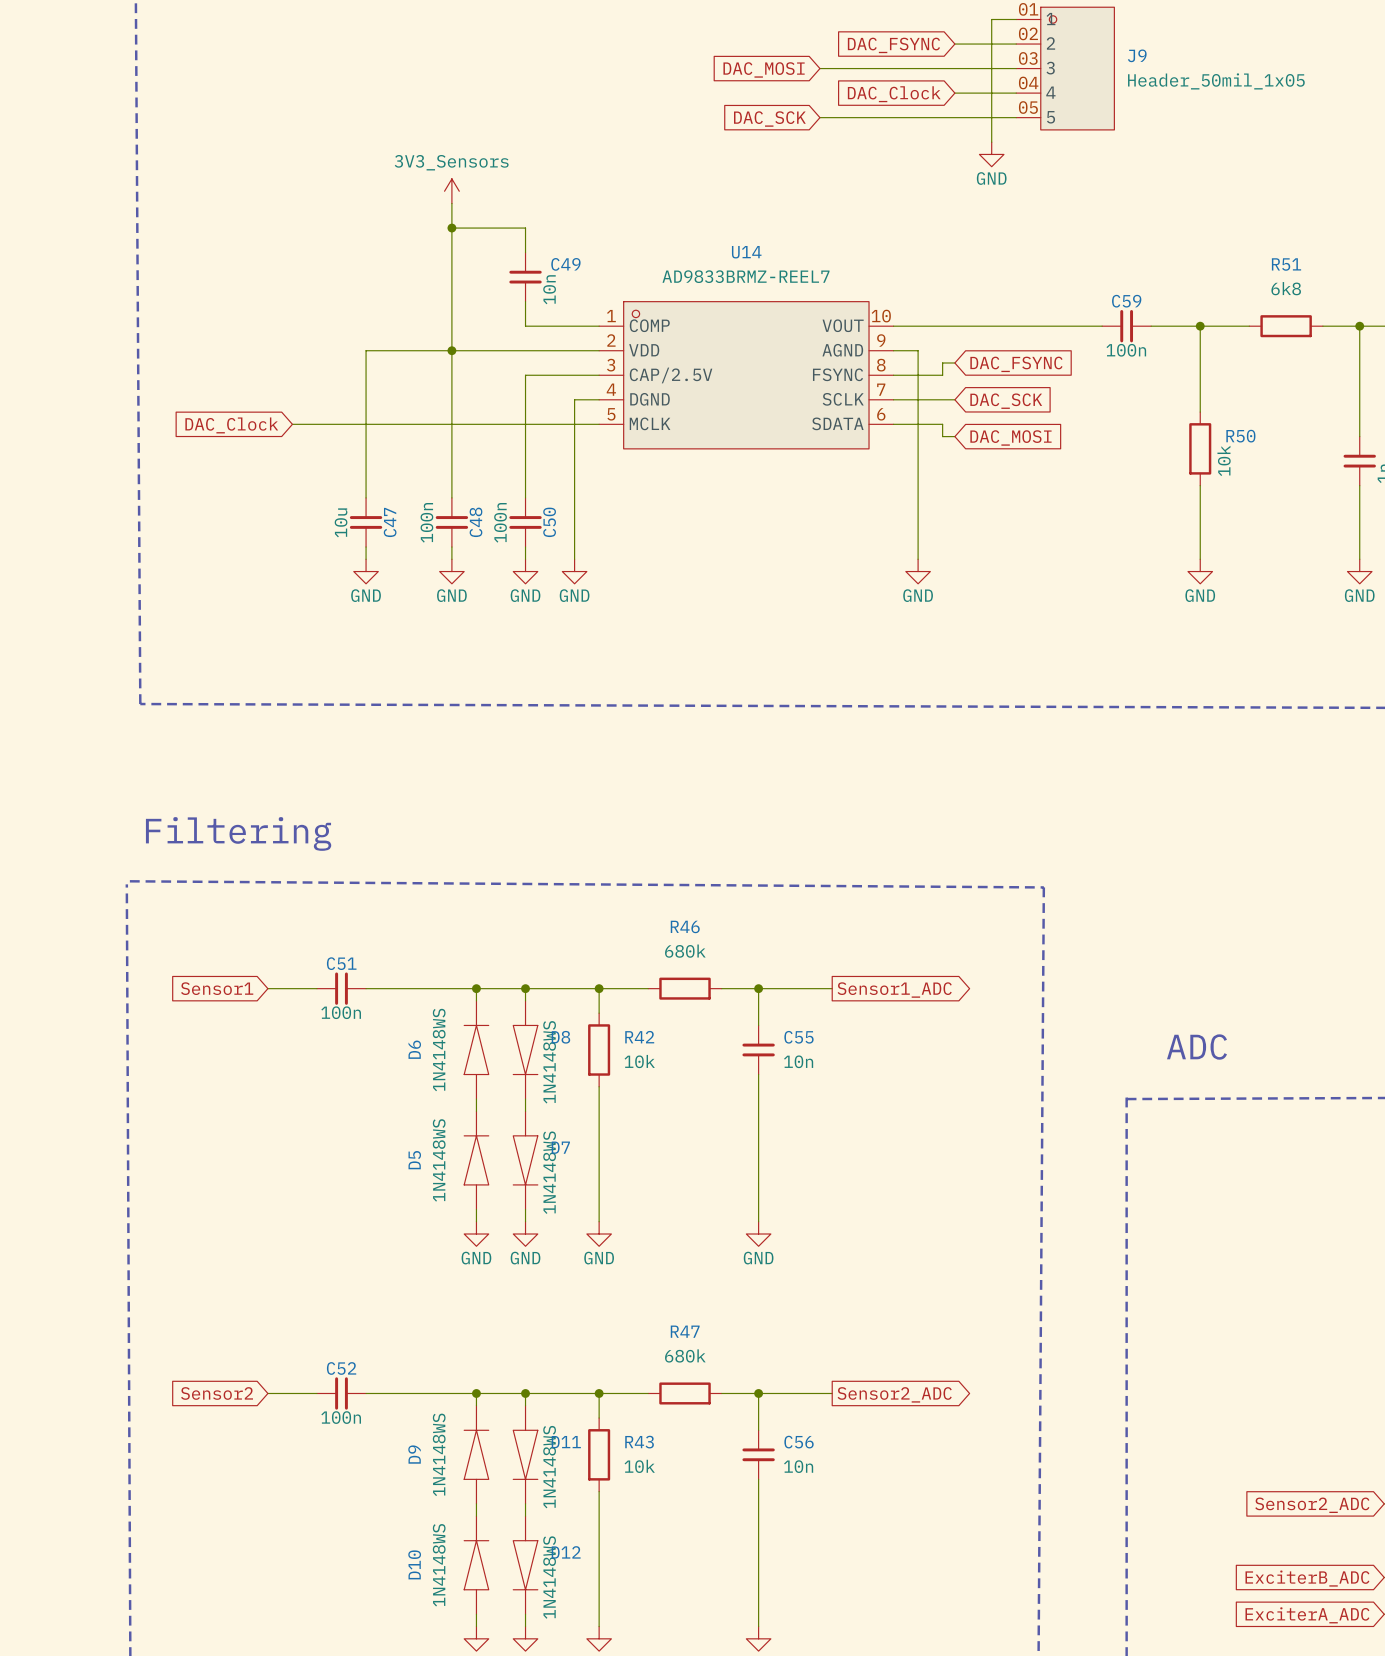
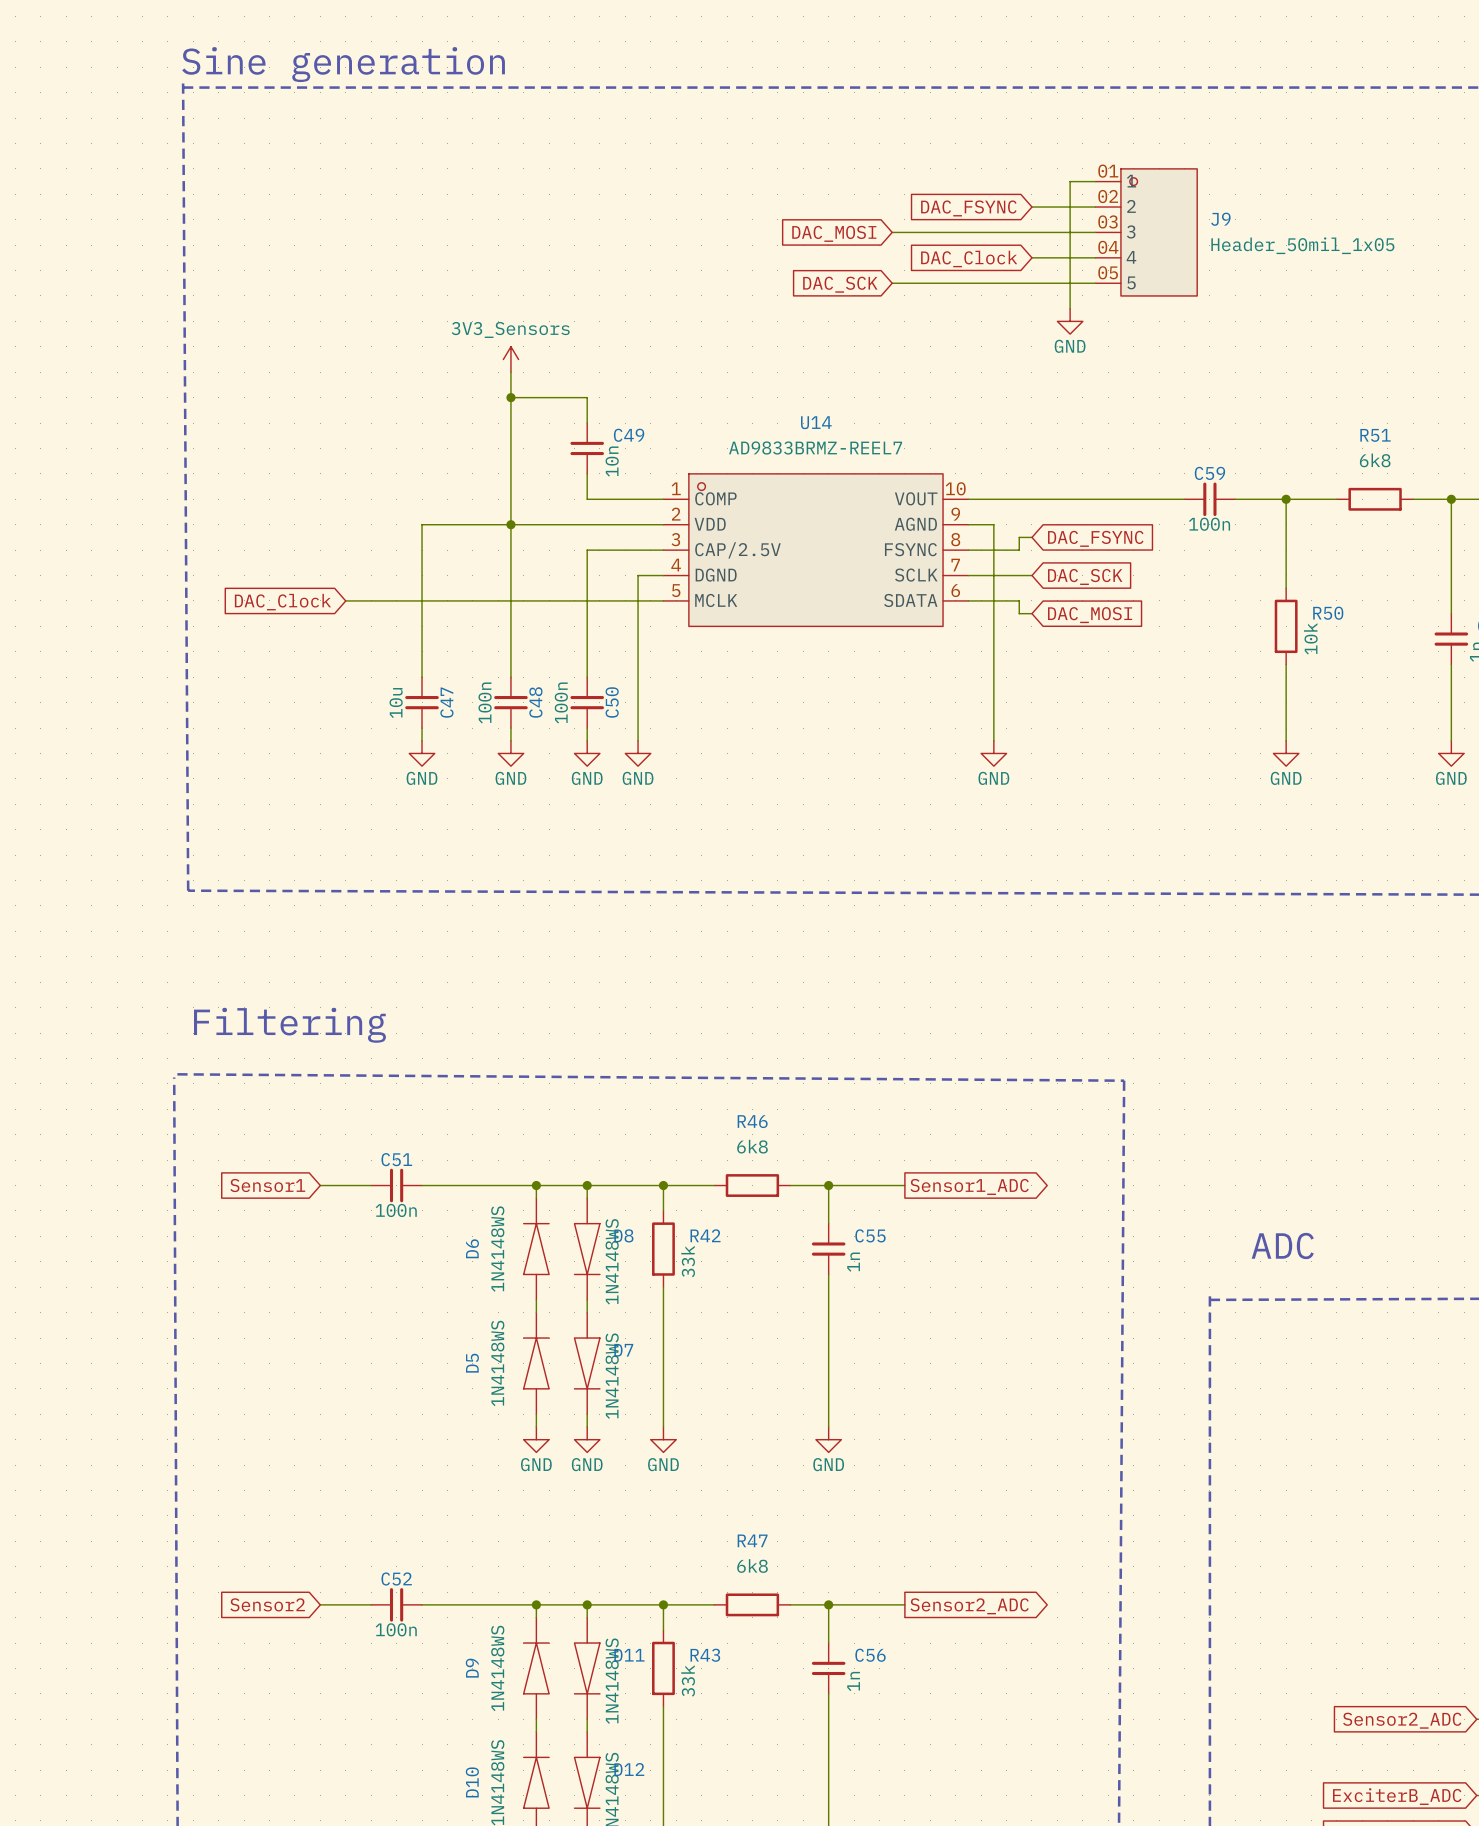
R46 value: 680k (685, 951) -> 6k8 (752, 1146)
R42 value: 10k (639, 1061) -> 33k (688, 1261)
C55 value: 10n (798, 1061) -> 1n (853, 1262)
R47 value: 680k (685, 1355) -> 6k8 (752, 1566)
R43 value: 10k (639, 1466) -> 33k (688, 1680)
C56 value: 10n (798, 1466) -> 1n (853, 1681)

